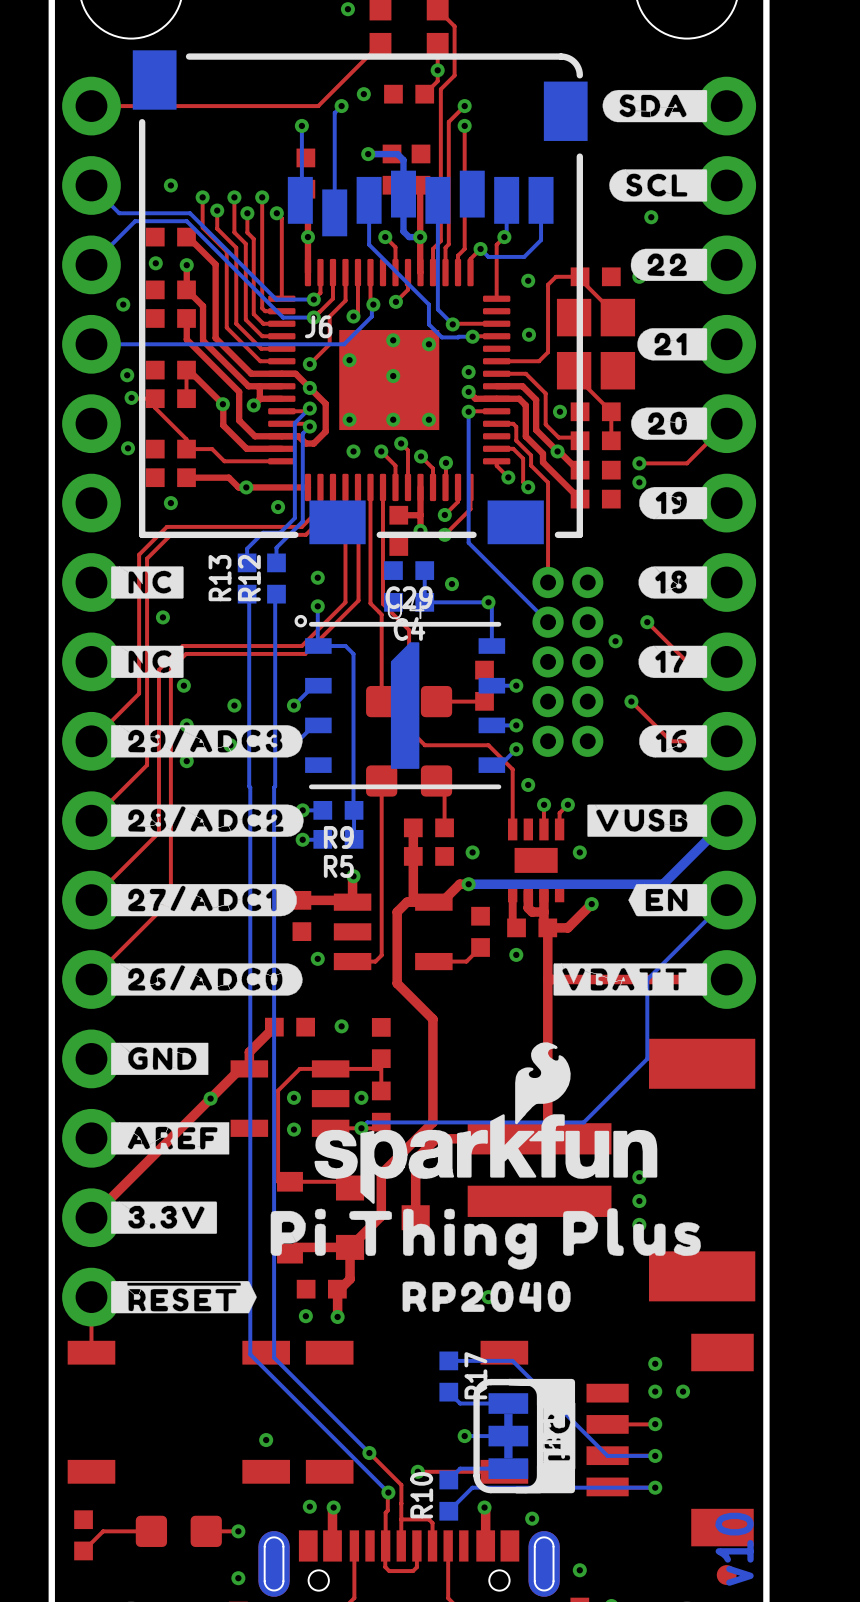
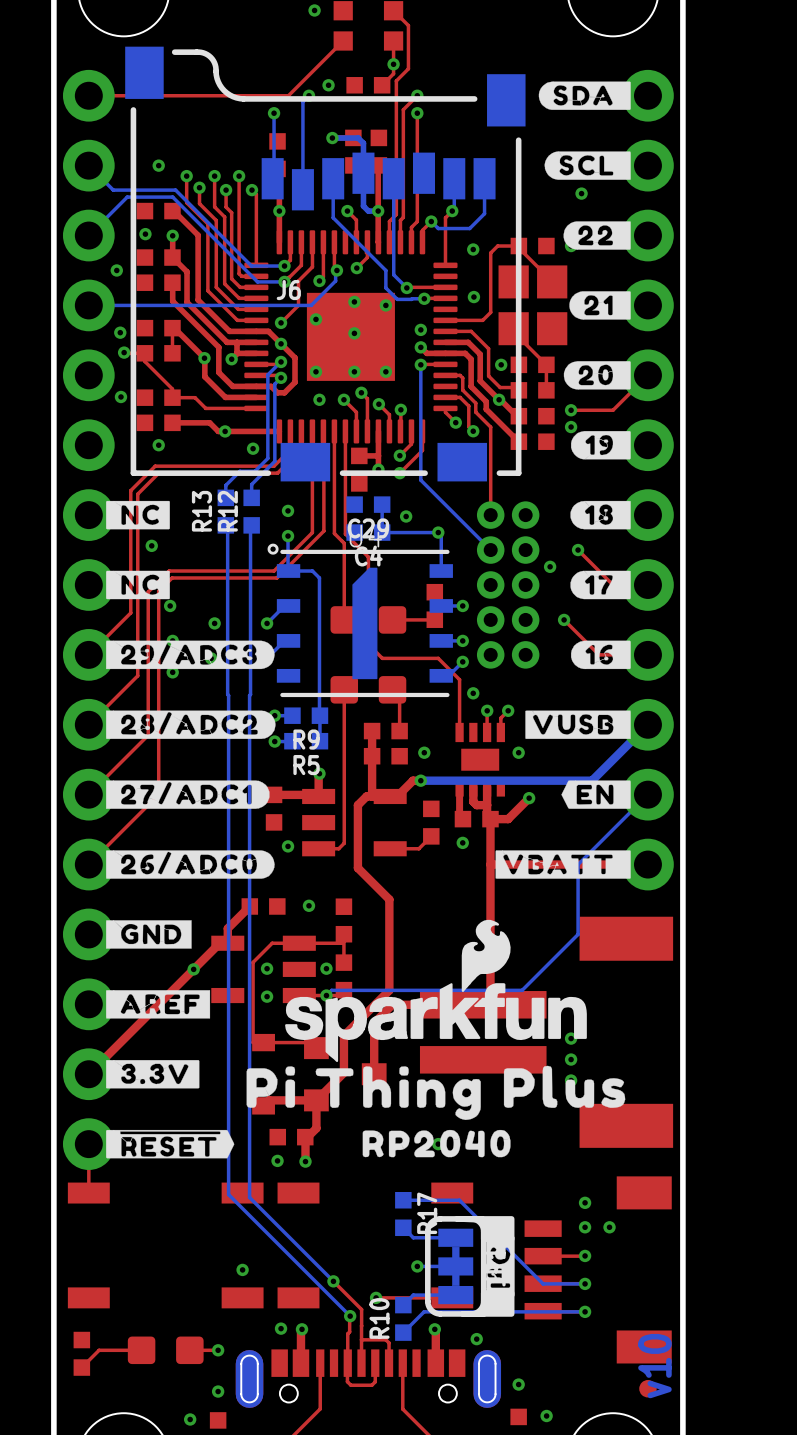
J6 footprint: [132, 50, 588, 545] -> [125, 46, 526, 482]

